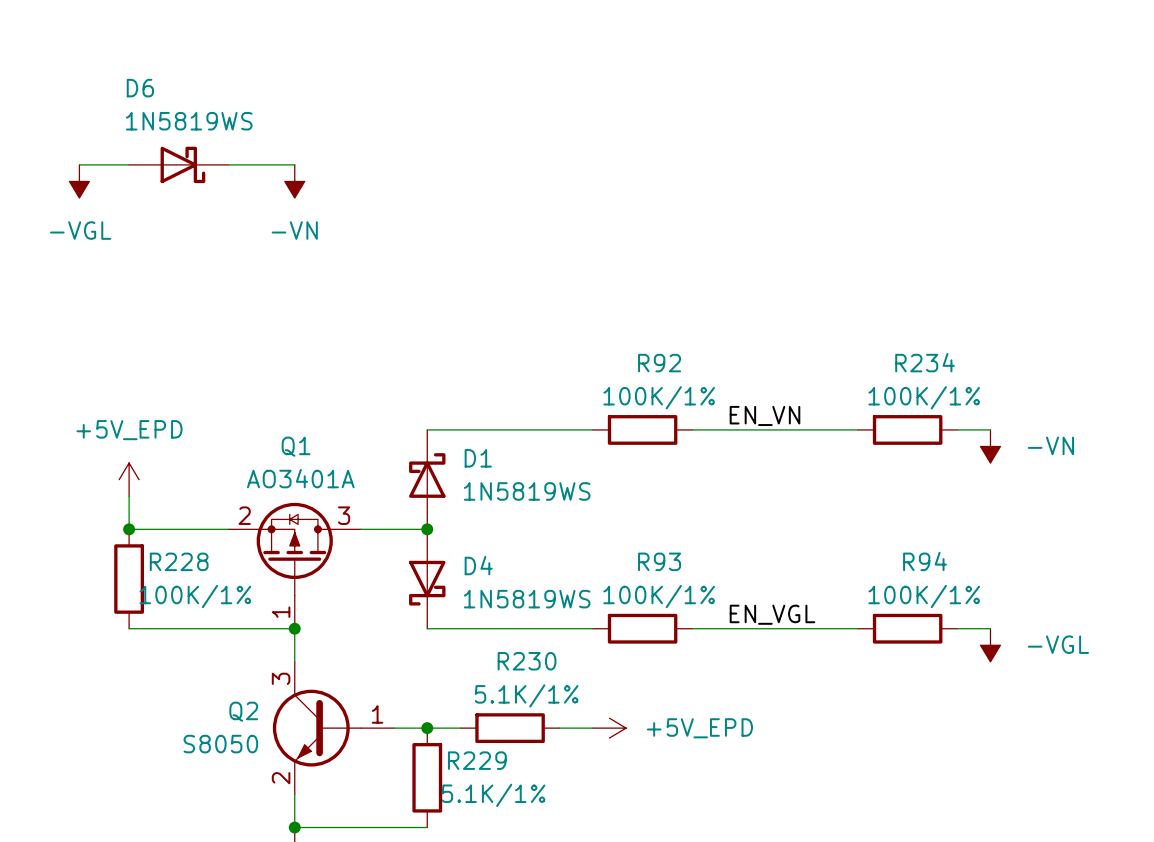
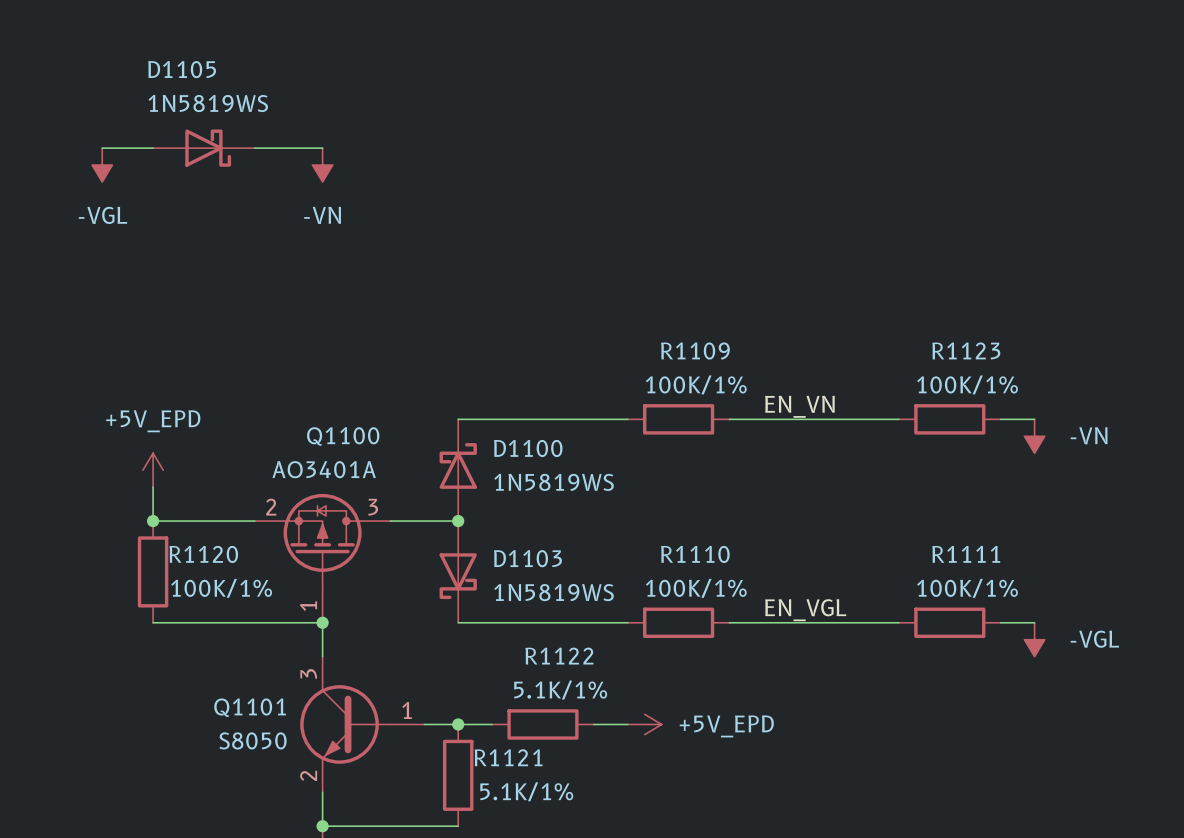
D6 name: D6 (140, 88) -> D1105 (182, 69)
R234 name: R234 (925, 362) -> R1123 (966, 350)
R92 name: R92 (659, 363) -> R1109 (695, 351)
Q1 name: Q1 (296, 446) -> Q1100 (343, 436)
D1 name: D1 (478, 458) -> D1100 (528, 448)
R228 name: R228 (179, 561) -> R1120 (203, 554)
R93 name: R93 (659, 561) -> R1110 (695, 554)
R94 name: R94 (925, 561) -> R1111 (966, 554)
D4 name: D4 (478, 565) -> D1103 (527, 558)
R230 name: R230 (527, 661) -> R1122 (559, 656)
Q2 name: Q2 (243, 711) -> Q1101 (250, 707)
R229 name: R229 (477, 760) -> R1121 (508, 757)

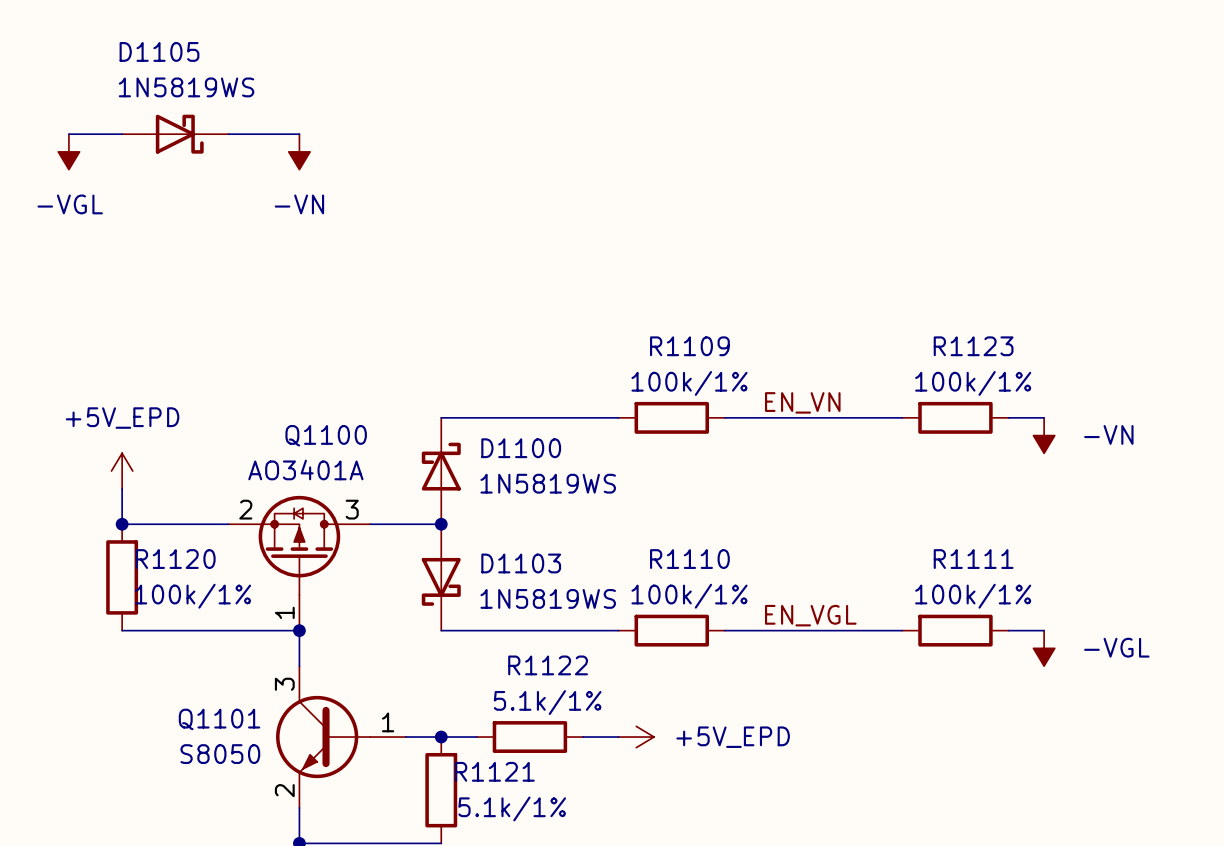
R1109 value: 100K/1% (696, 384) -> 100k/1% (689, 383)
R1123 value: 100K/1% (967, 384) -> 100k/1% (973, 383)
R1120 value: 100K/1% (221, 588) -> 100k/1% (193, 596)
R1110 value: 100K/1% (696, 588) -> 100k/1% (689, 596)
R1111 value: 100K/1% (967, 588) -> 100k/1% (973, 596)
R1122 value: 5.1K/1% (560, 690) -> 5.1k/1% (547, 702)
R1121 value: 5.1K/1% (526, 791) -> 5.1k/1% (512, 808)

